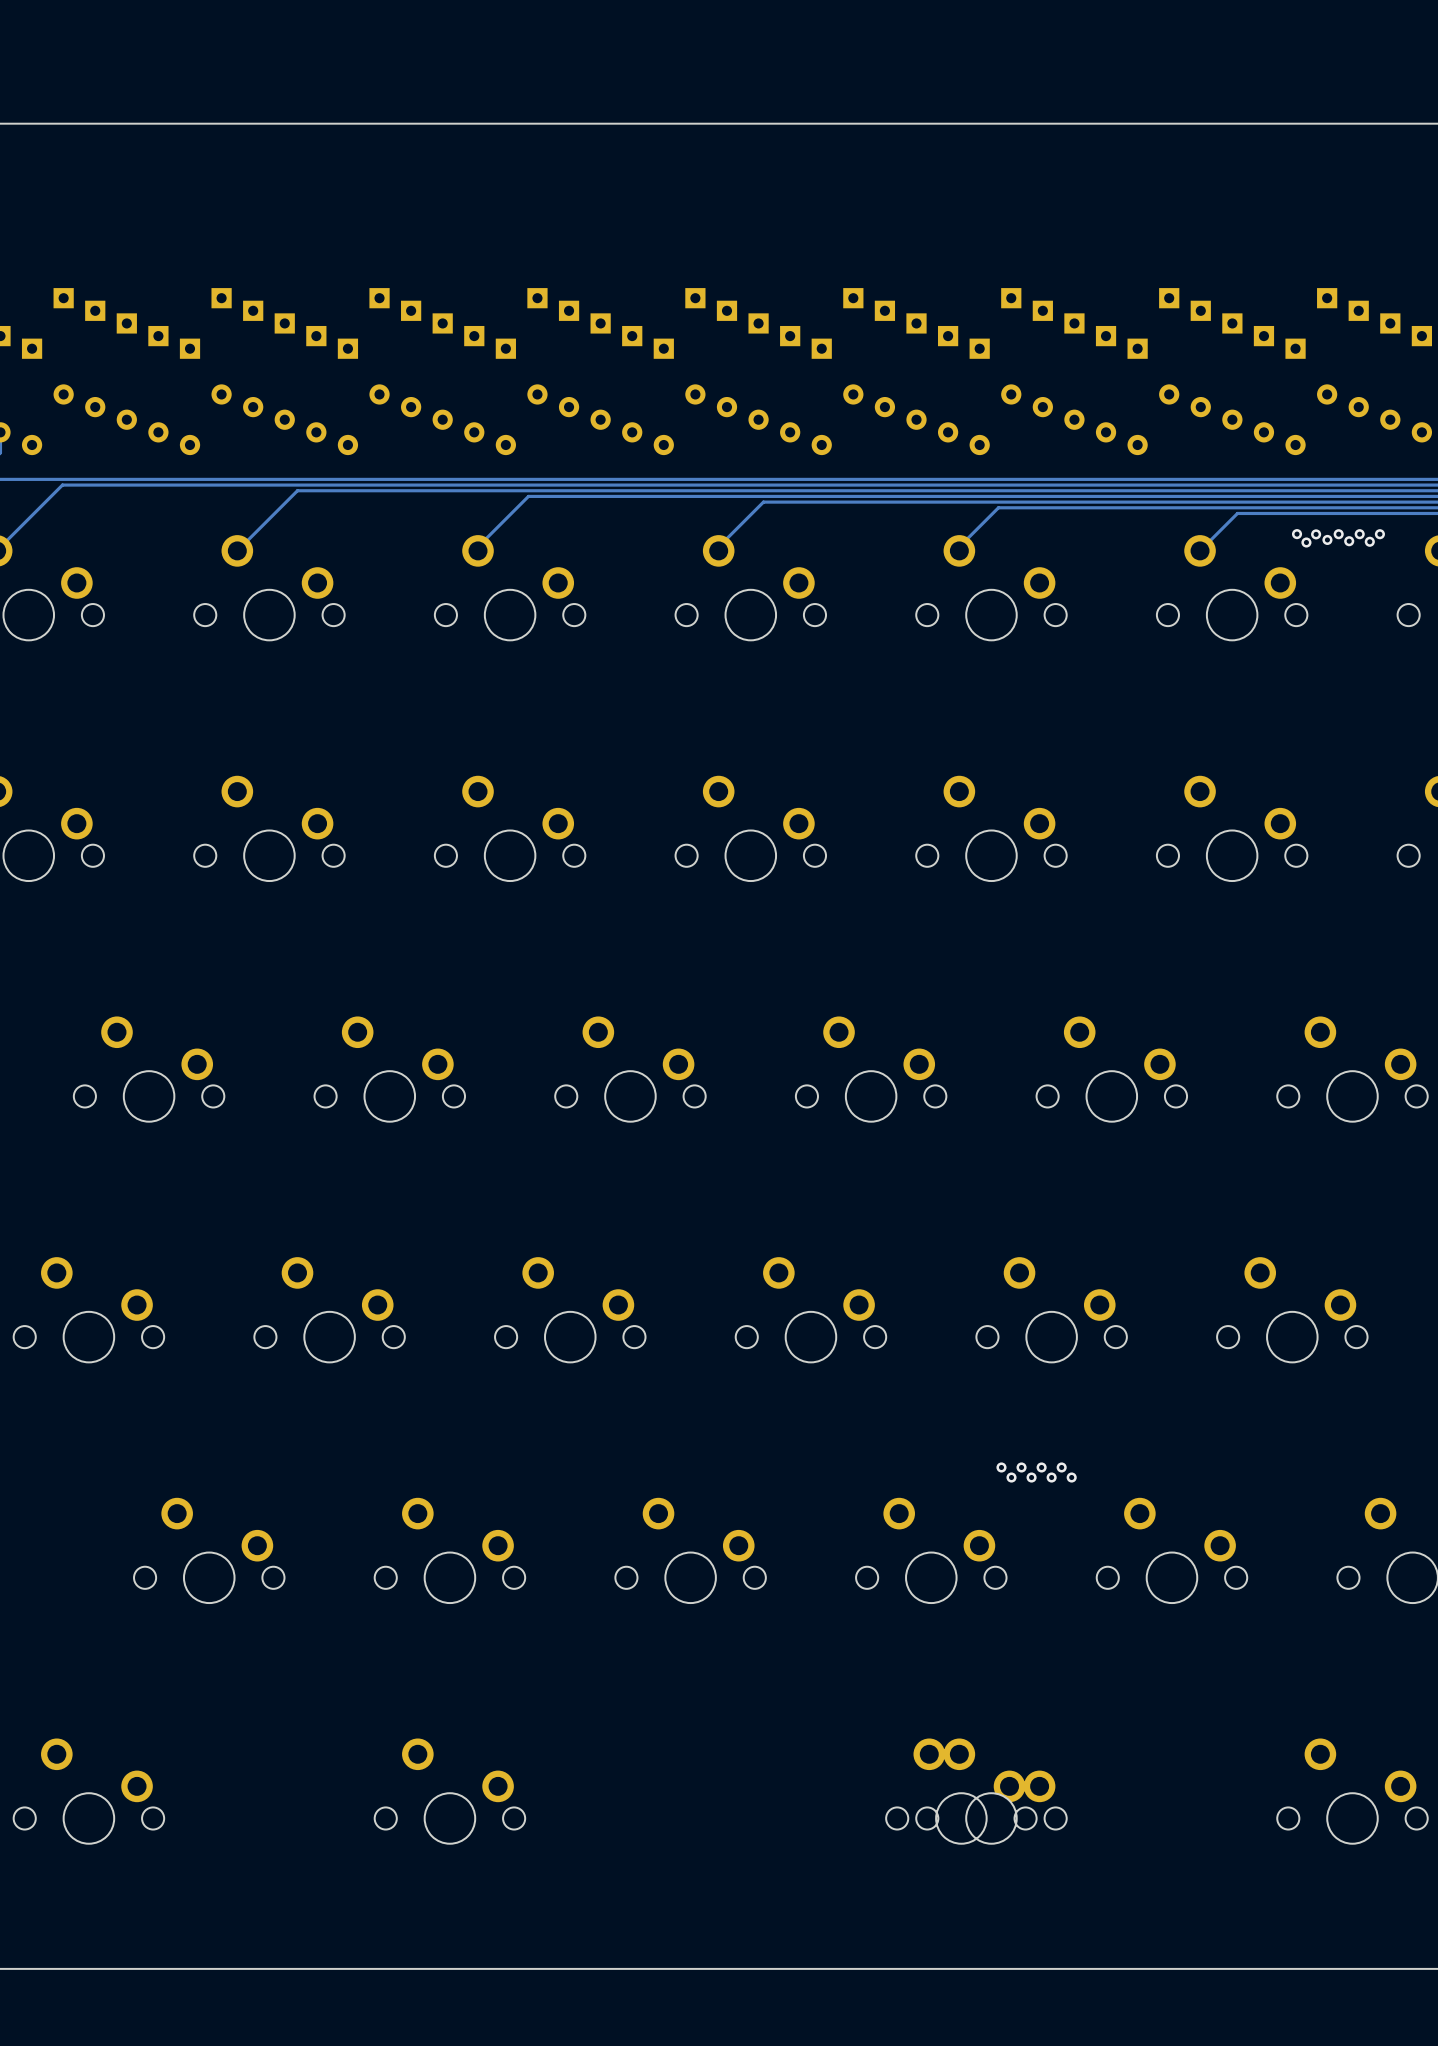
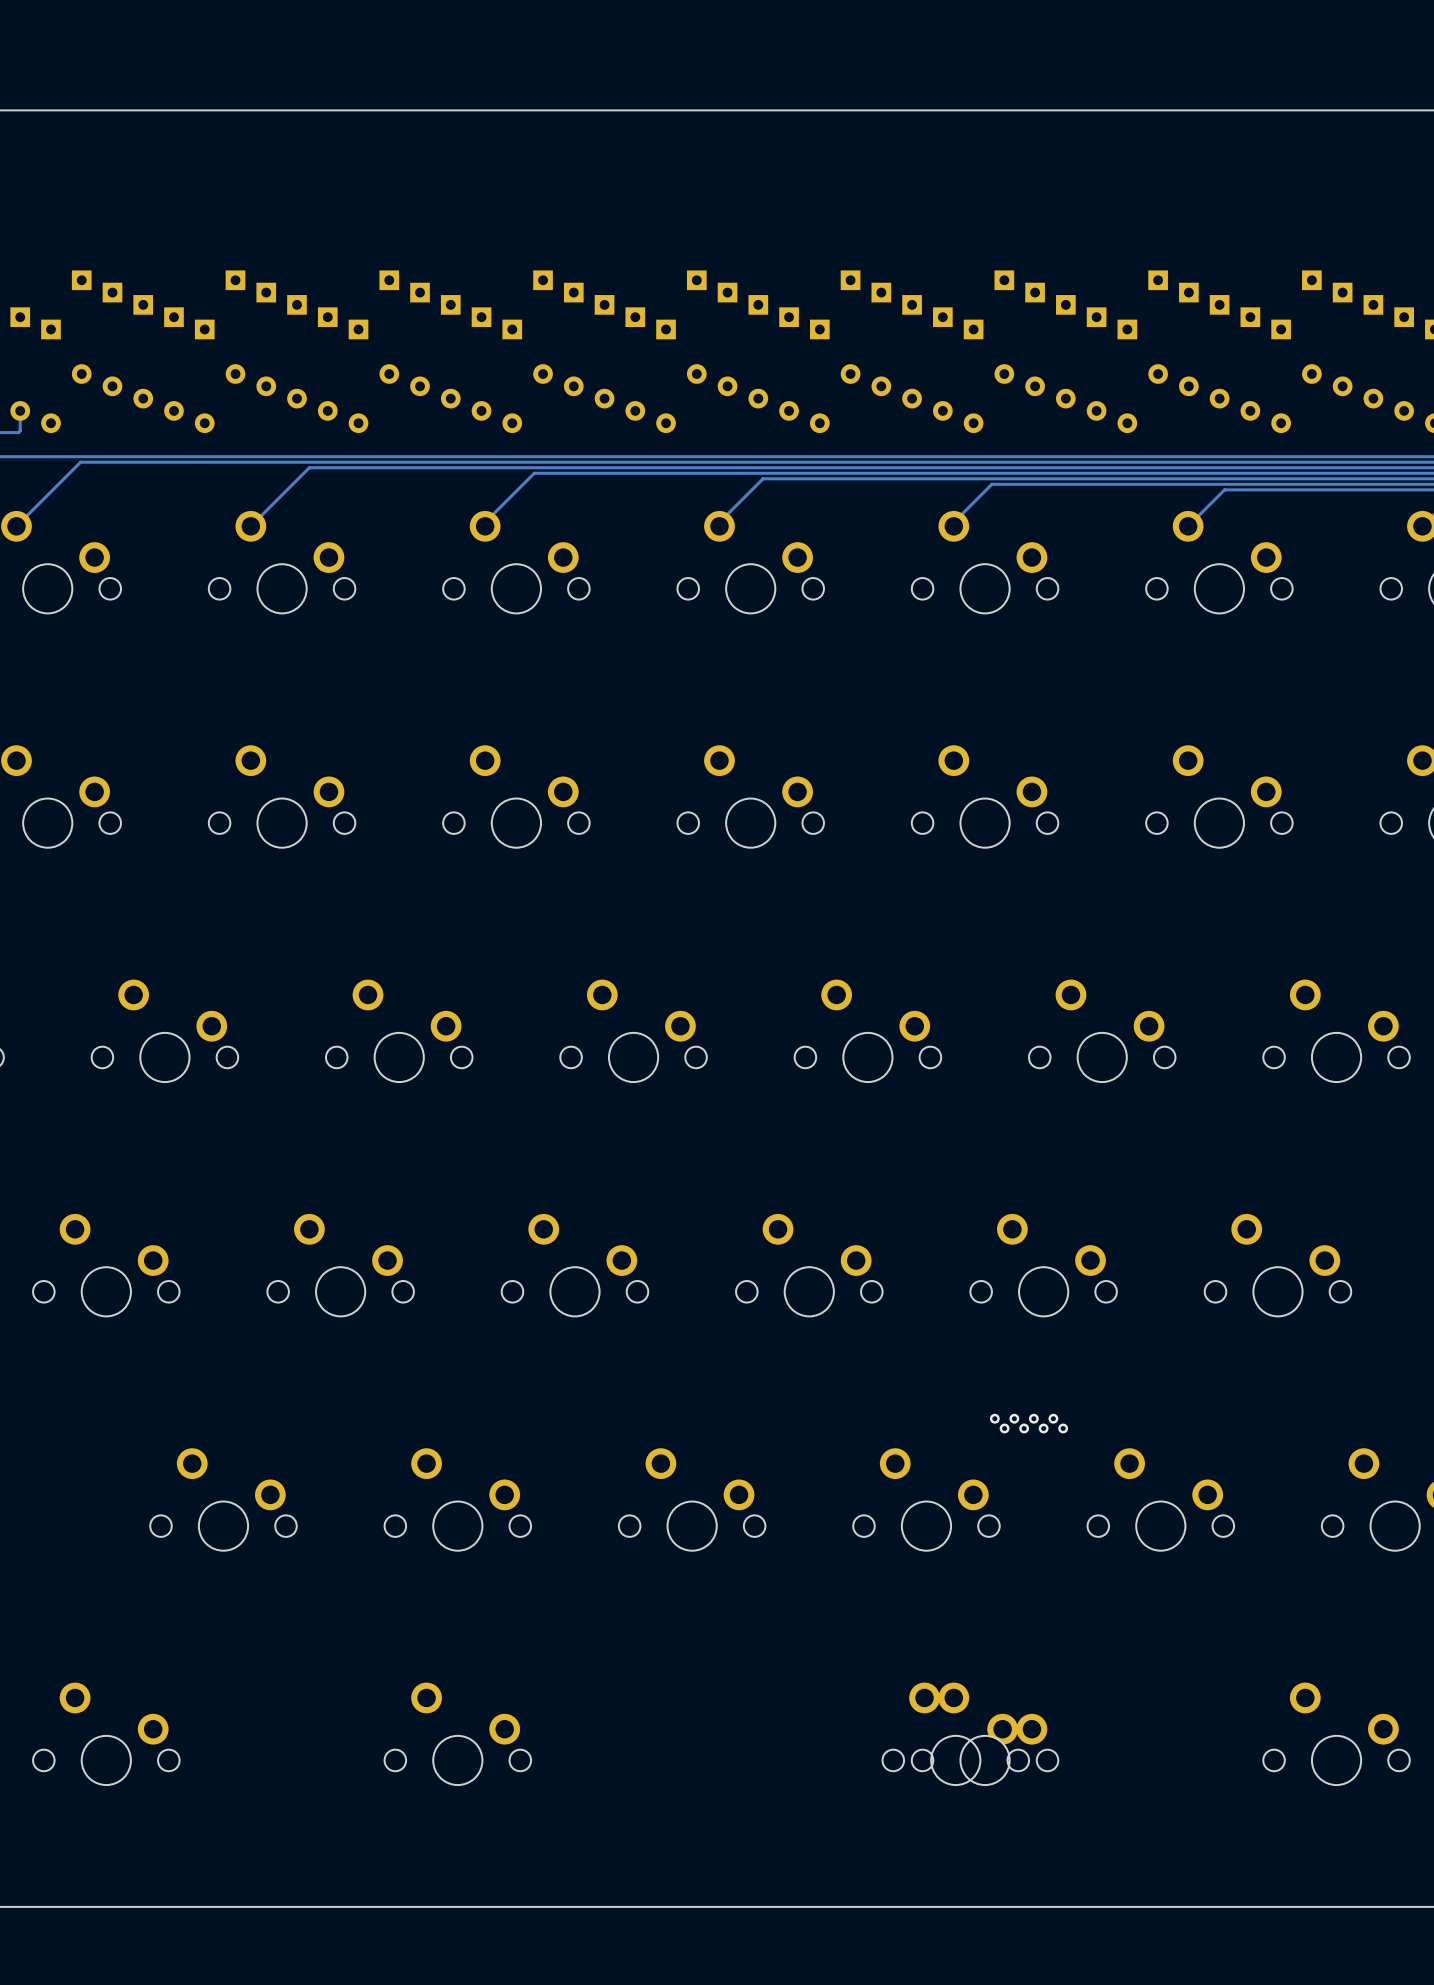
via: (1297, 534) -> none
via: (1316, 534) -> none
via: (1338, 534) -> none
via: (1359, 534) -> none
via: (1379, 534) -> none
via: (1327, 539) -> none
via: (1349, 541) -> none
via: (1369, 541) -> none
via: (1306, 542) -> none

